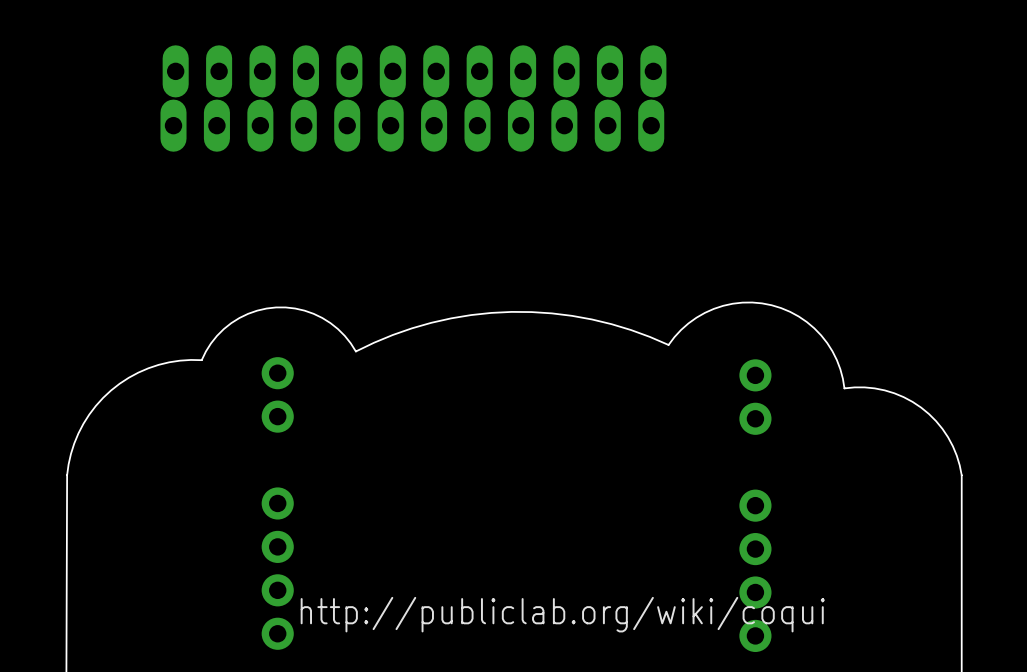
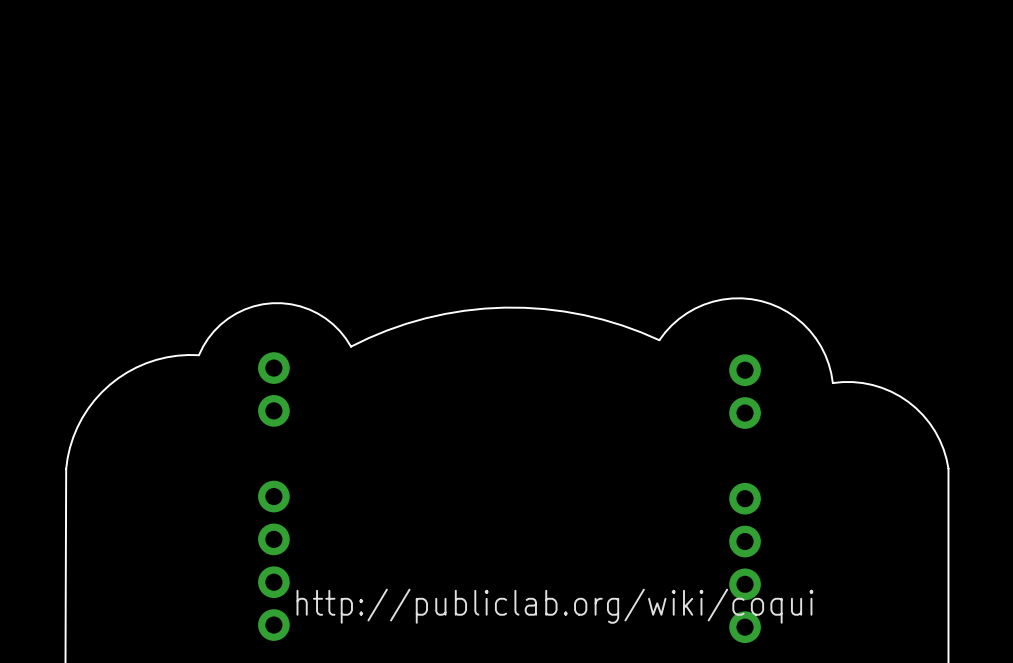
part: (414, 71) -> none
part: (412, 125) -> none

